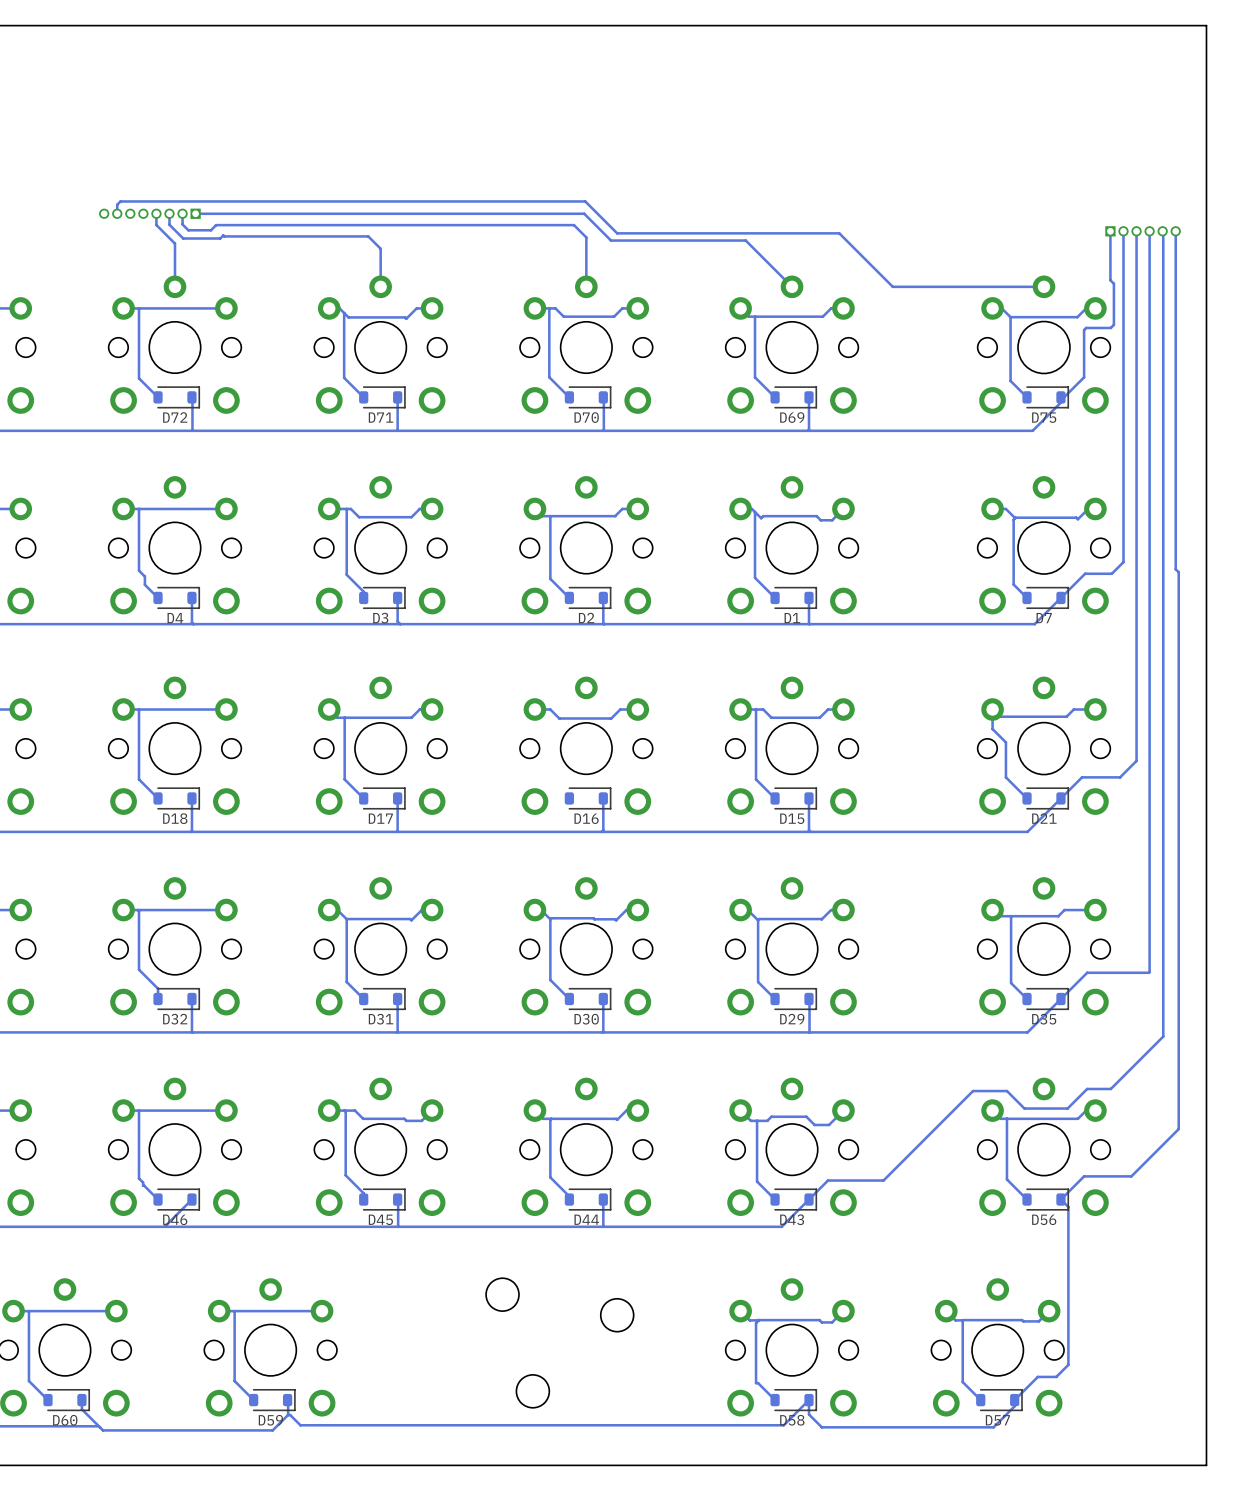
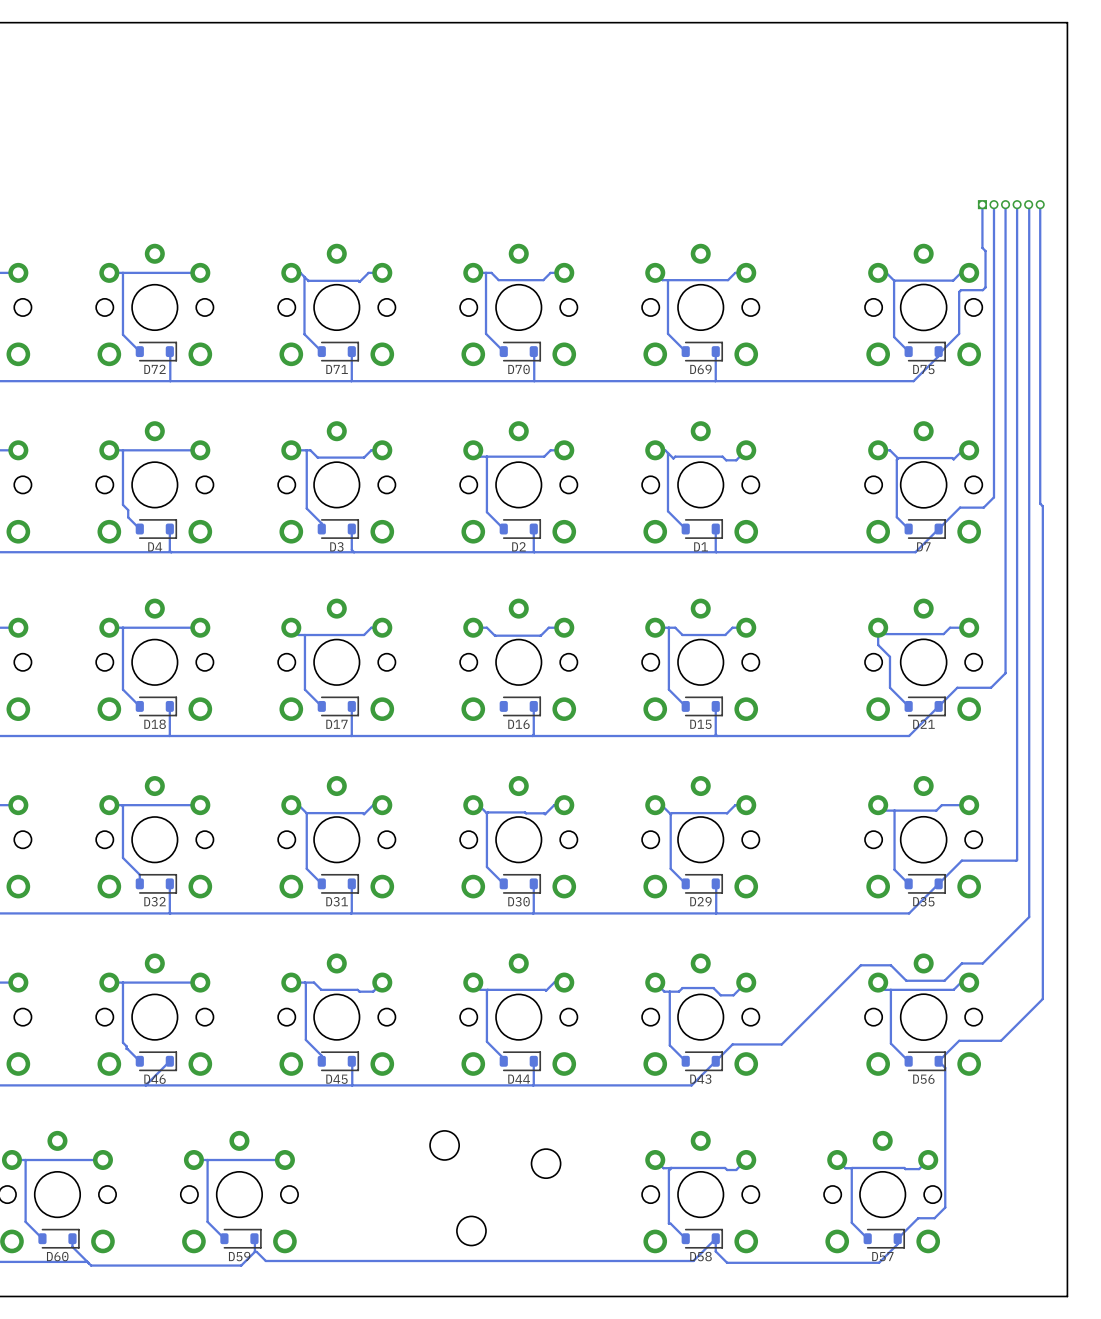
track: (117, 213) (117, 204) (120, 201) (585, 201) (617, 233) (839, 233) (892, 286) (1043, 286) -> none
part: (149, 213) -> none
track: (156, 213) (156, 225) (174, 243) (174, 286) -> none
track: (169, 213) (169, 224) (183, 238) (220, 238) (223, 235) (368, 236) (380, 248) (380, 286) -> none
track: (182, 213) (182, 224) (188, 230) (210, 230) (216, 225) (574, 225) (586, 237) (586, 286) -> none
track: (195, 213) (584, 213) (611, 240) (745, 240) (792, 286) -> none

